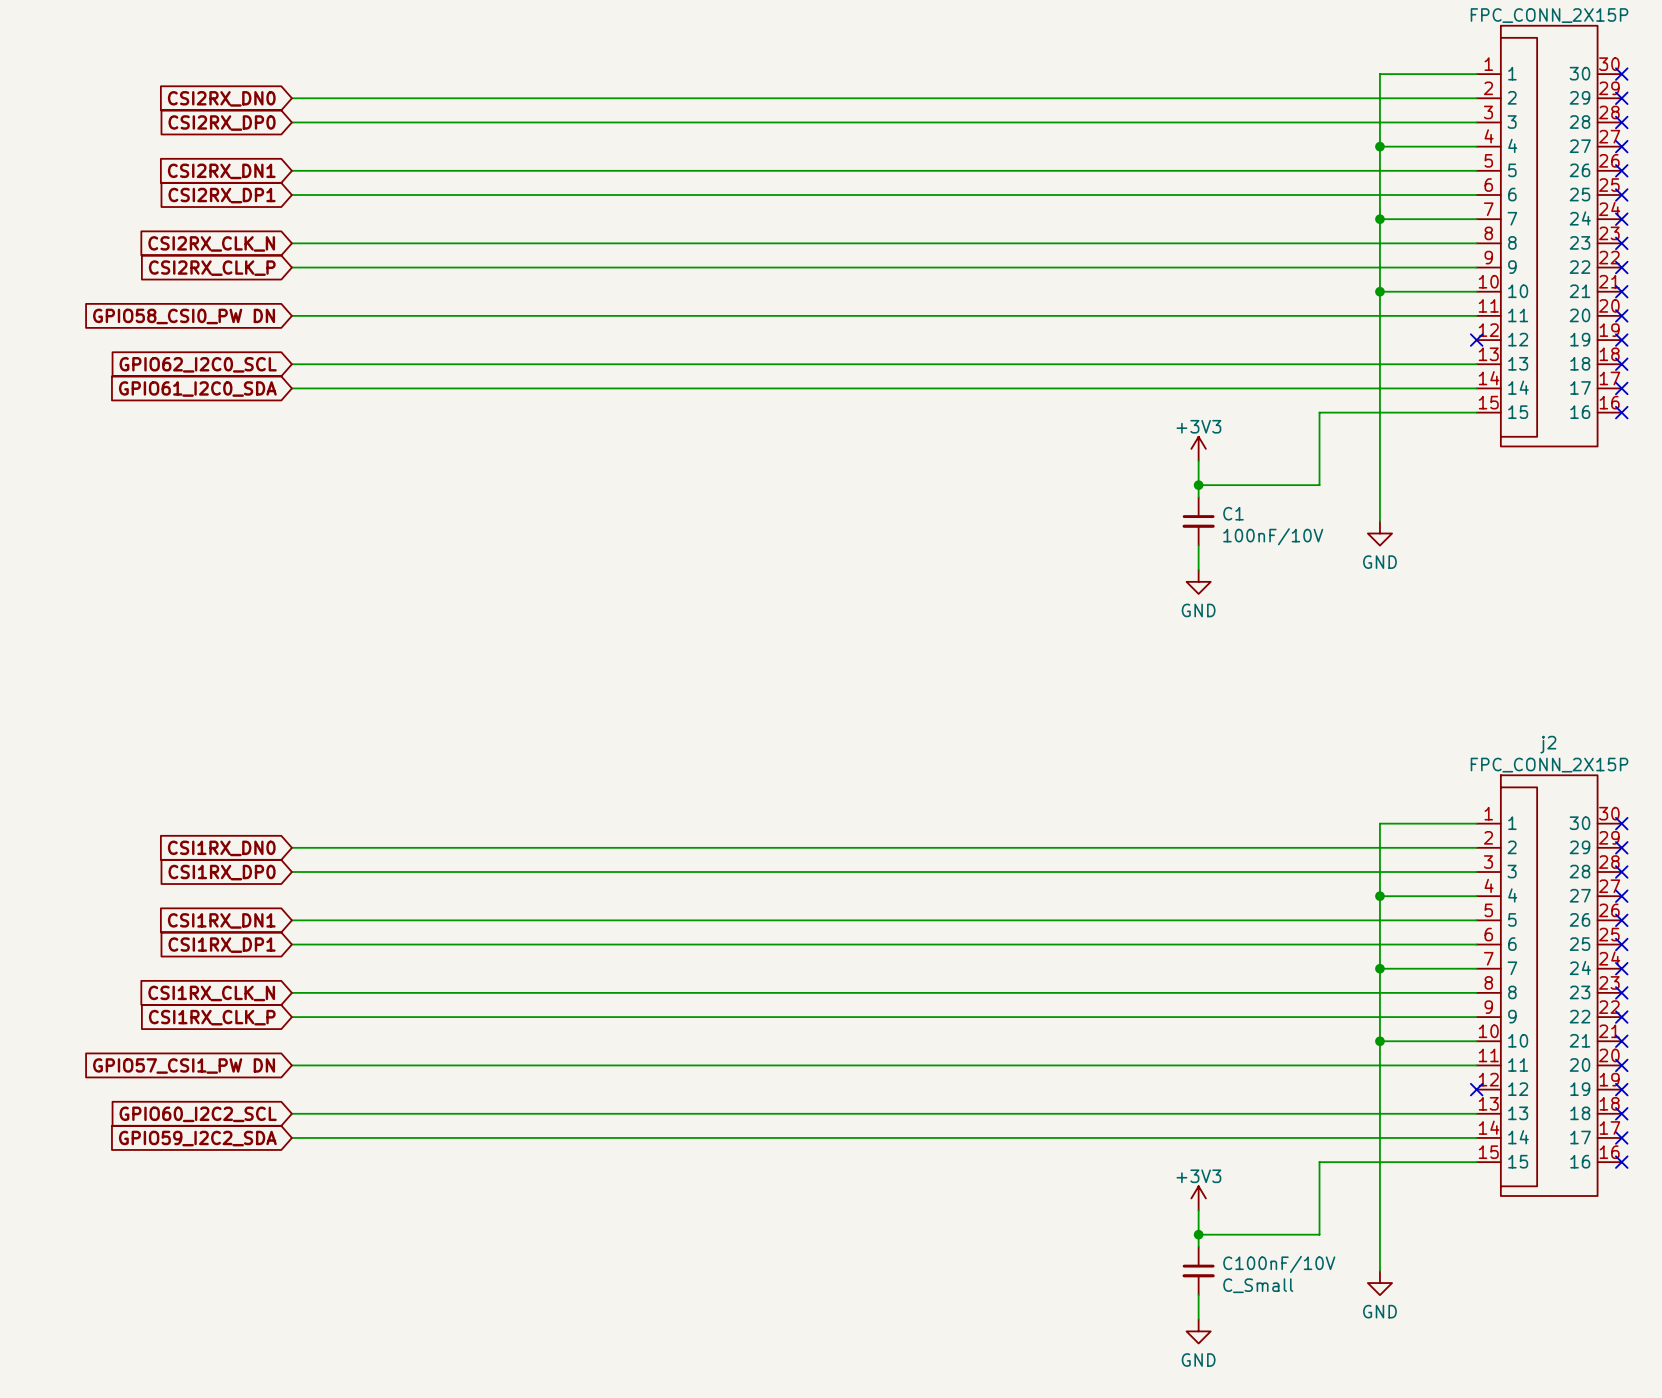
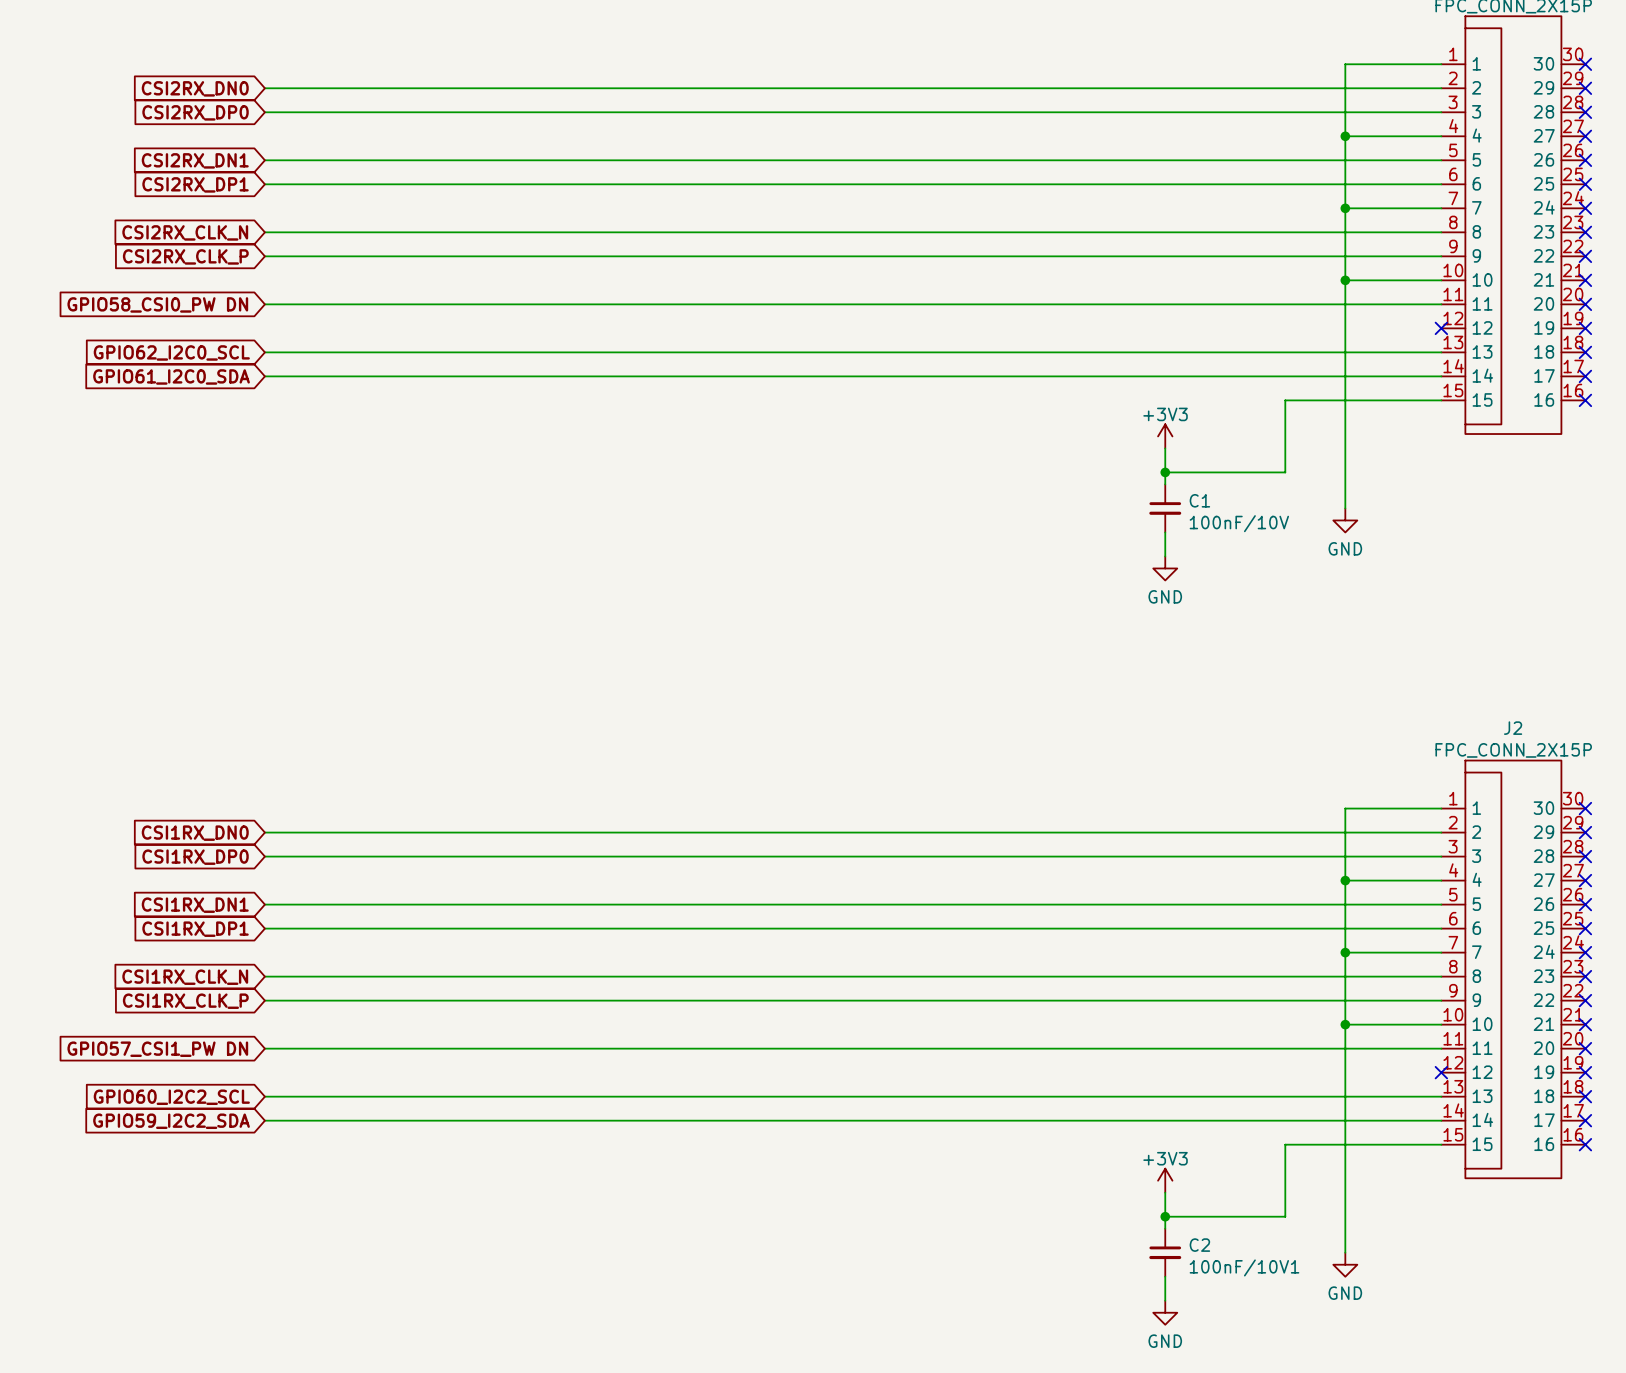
j2 name: j2 (1548, 744) -> J2 (1513, 728)
C100nF/10V name: C100nF/10V (1279, 1264) -> C2 (1199, 1245)
C100nF/10V value: C_Small (1258, 1285) -> 100nF/10V1 (1244, 1267)

